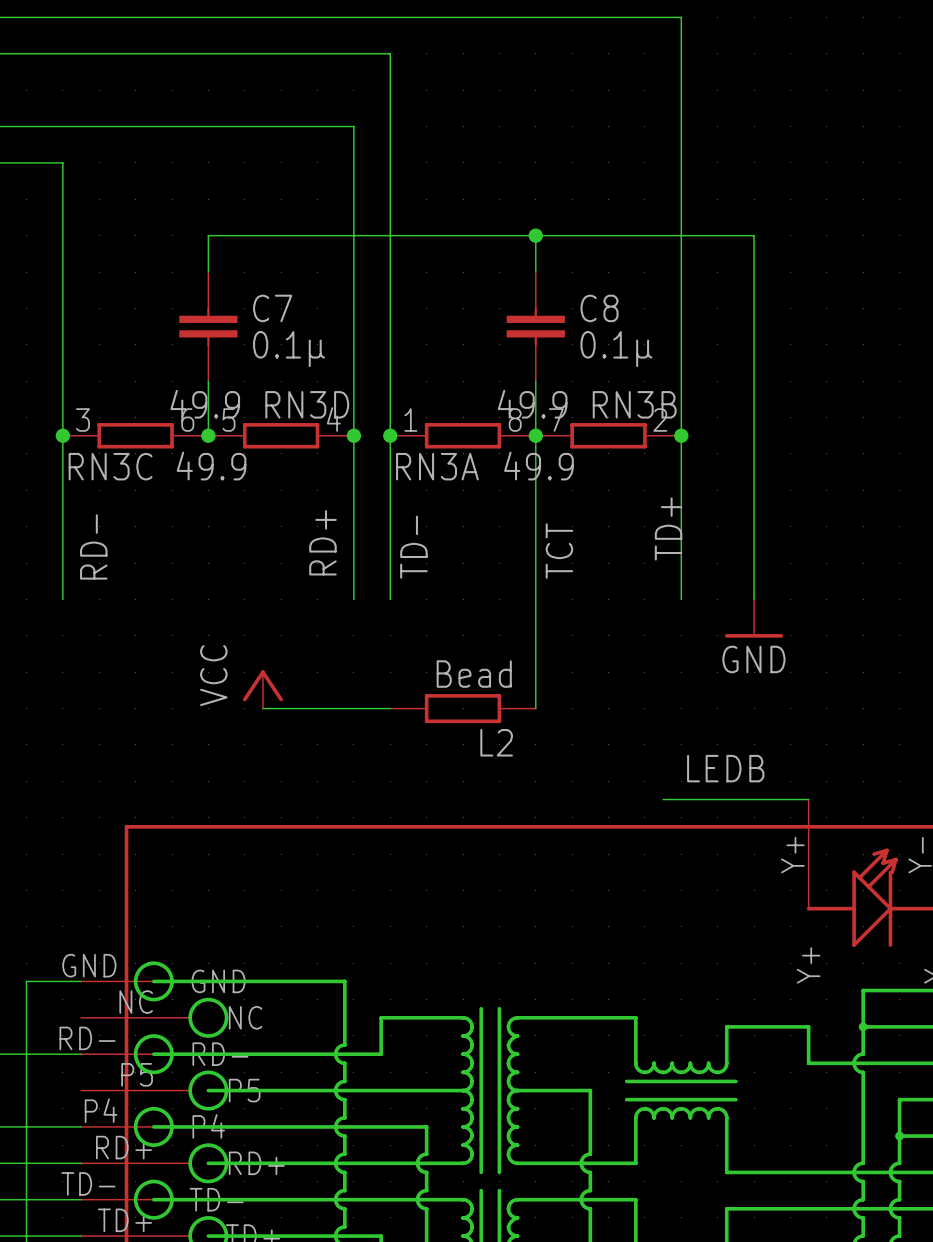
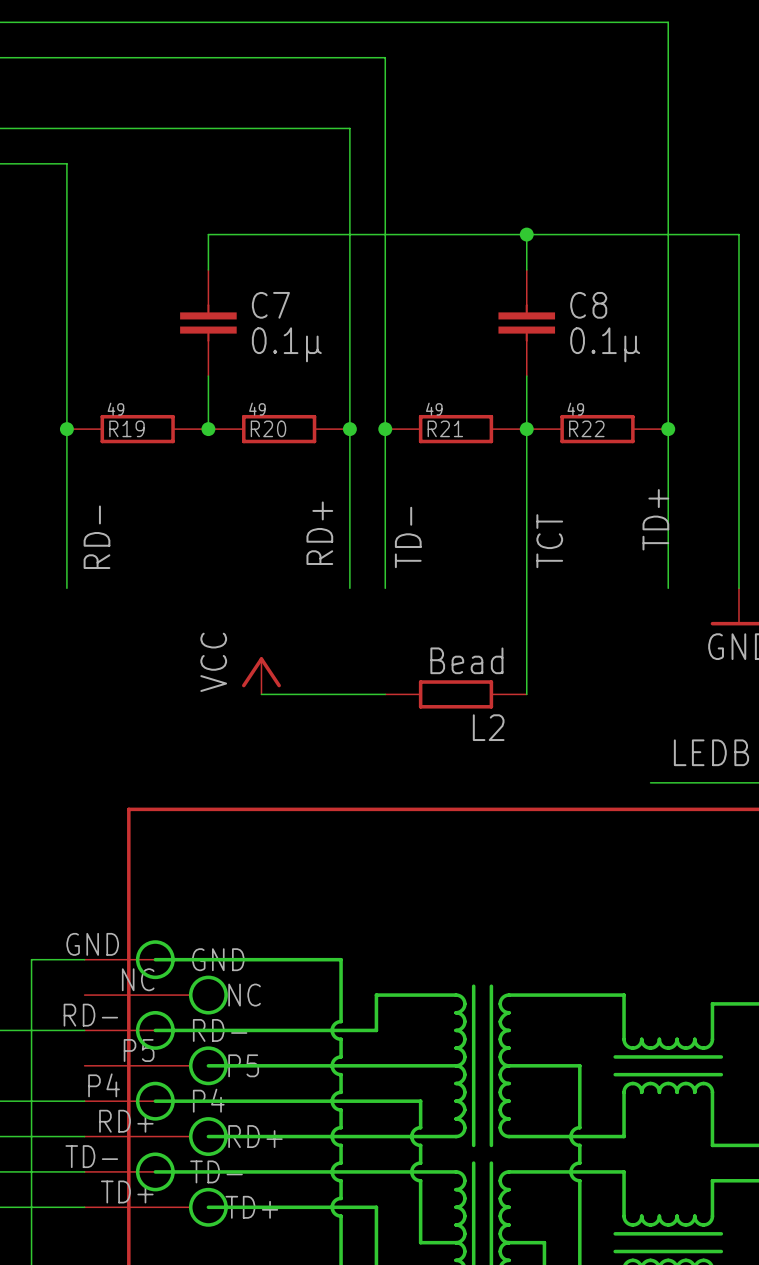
RN3C: 49.9 (135, 435) -> none
R19: none -> 49 (137, 429)
RN3D: 49.9 (281, 435) -> none
R20: none -> 49 (279, 429)
RN3A: 49.9 (463, 435) -> none
R21: none -> 49 (456, 429)
RN3B: 49.9 (608, 435) -> none
R22: none -> 49 (597, 429)

